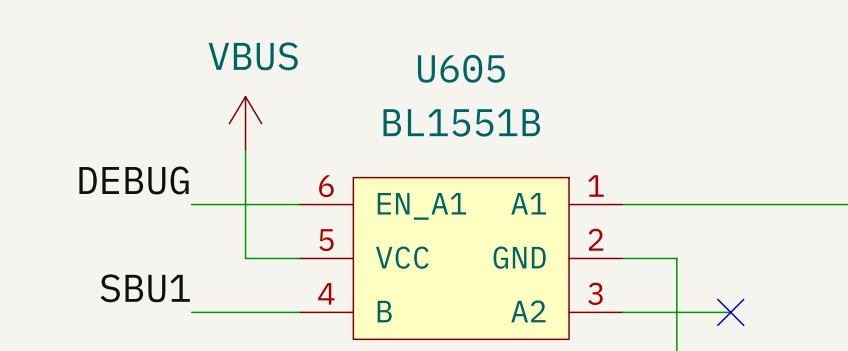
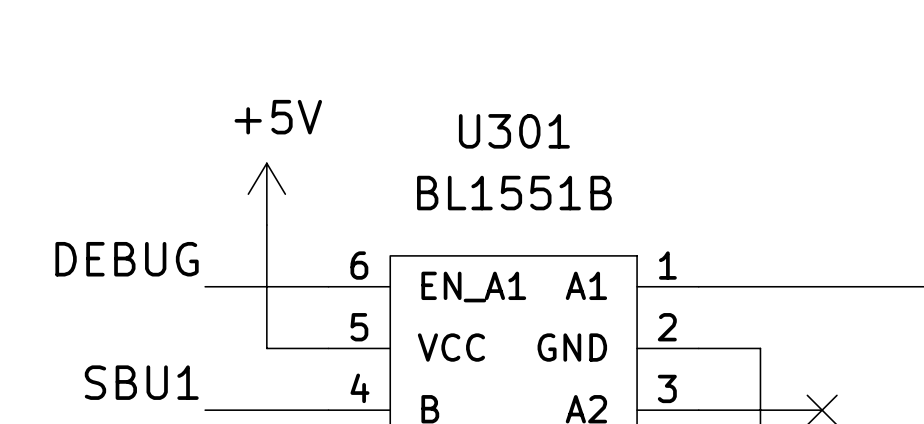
U605 name: U605 (461, 68) -> U301 (514, 131)
power symbol: VBUS (245, 123) -> +5V (266, 194)

